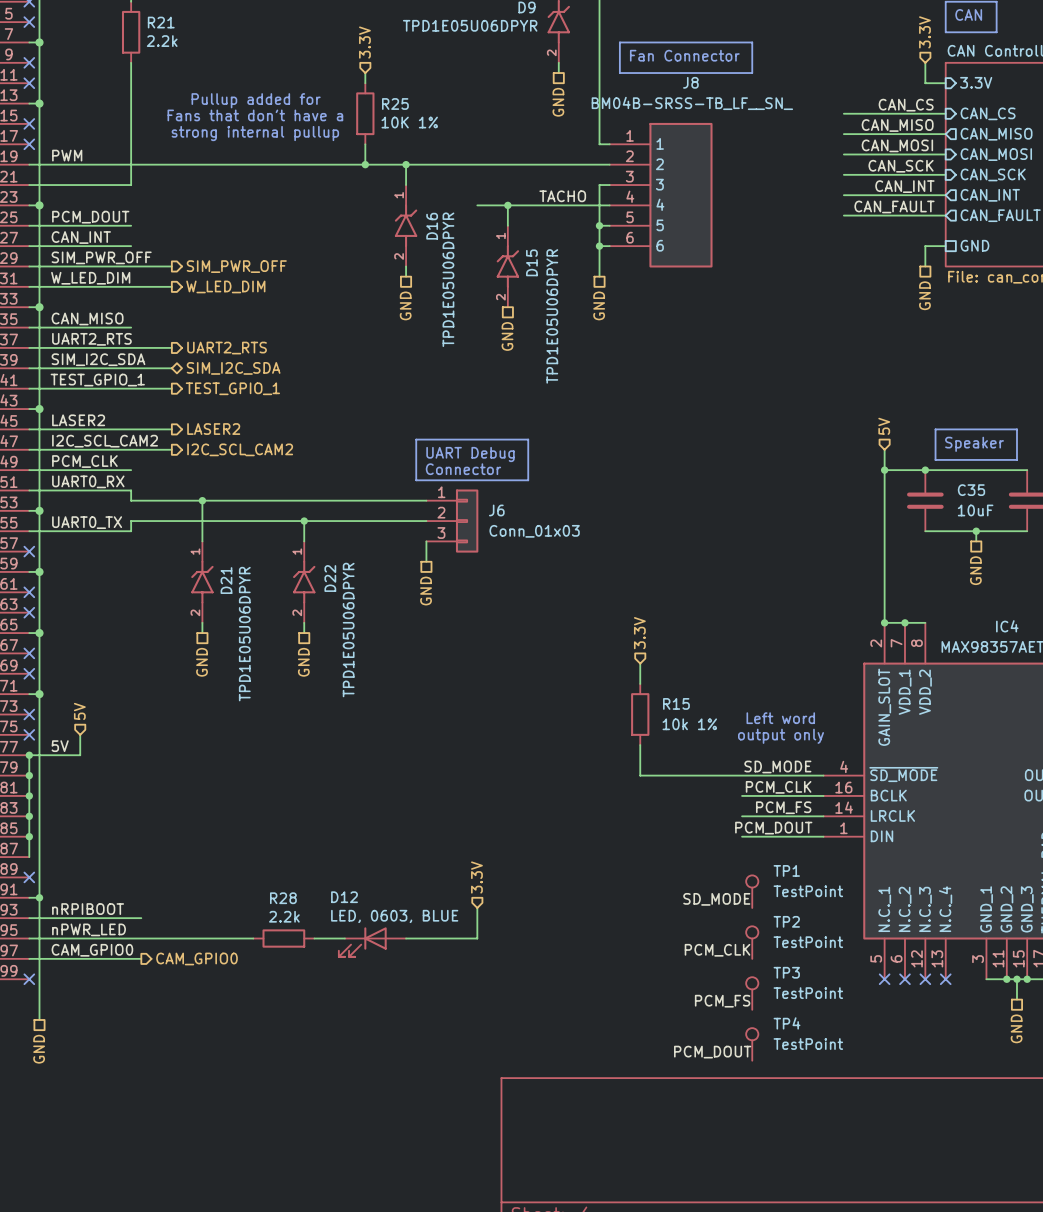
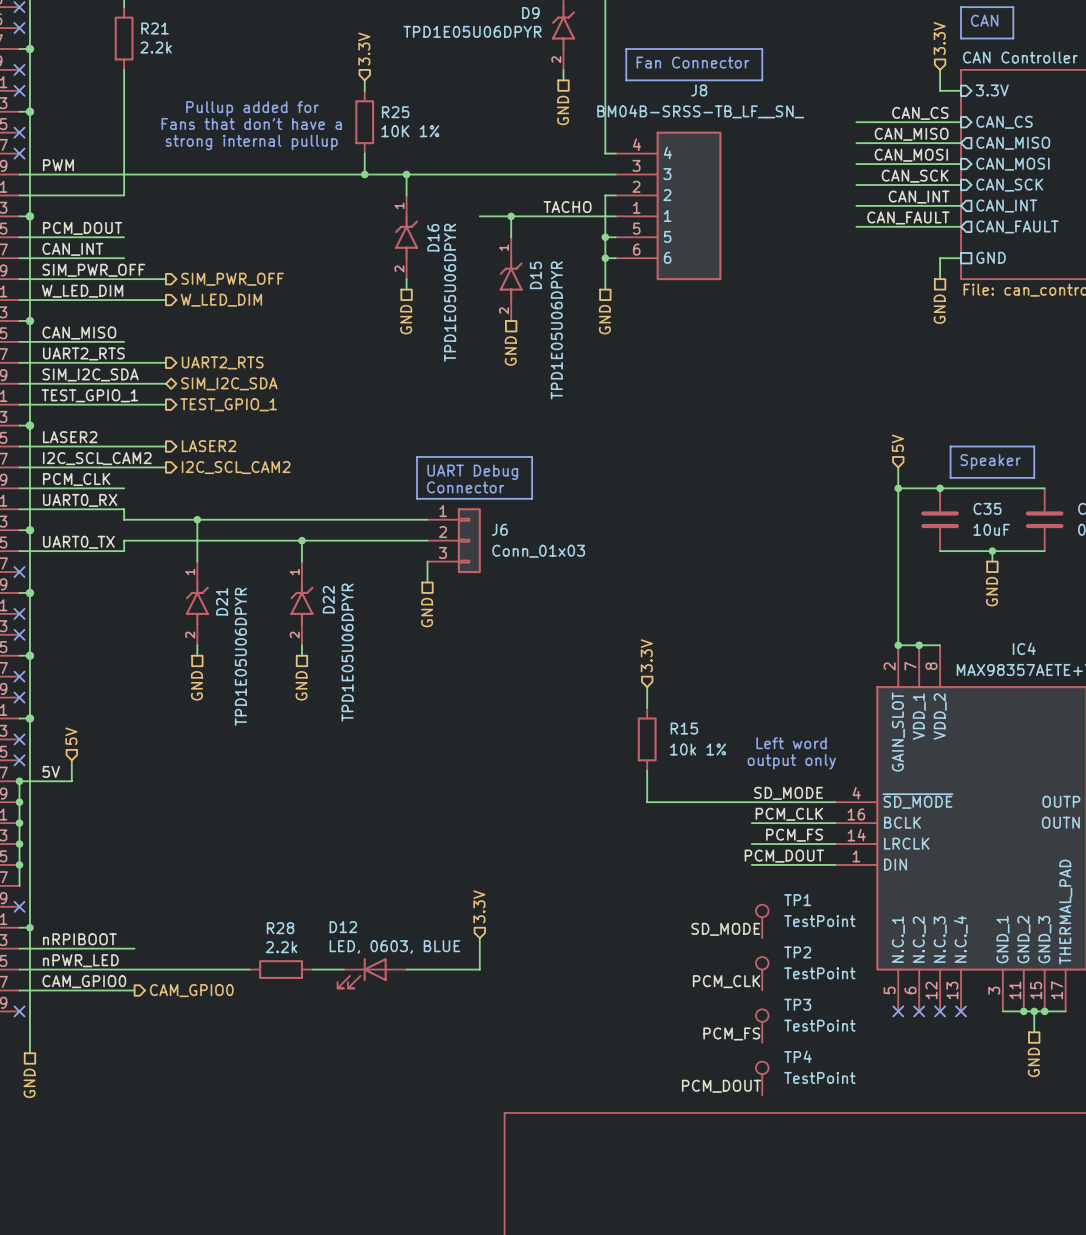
J8 pin number: 1 (630, 135) -> 4 (636, 144)
J8 pin name: 1 (660, 143) -> 4 (667, 152)
J8 pin number: 2 (629, 156) -> 3 (636, 165)
J8 pin name: 2 (659, 164) -> 3 (667, 174)
J8 pin number: 3 (629, 176) -> 2 (636, 186)
J8 pin name: 3 (659, 184) -> 2 (667, 195)
J8 pin number: 4 (630, 196) -> 1 (636, 207)
J8 pin name: 4 (660, 204) -> 1 (667, 215)

